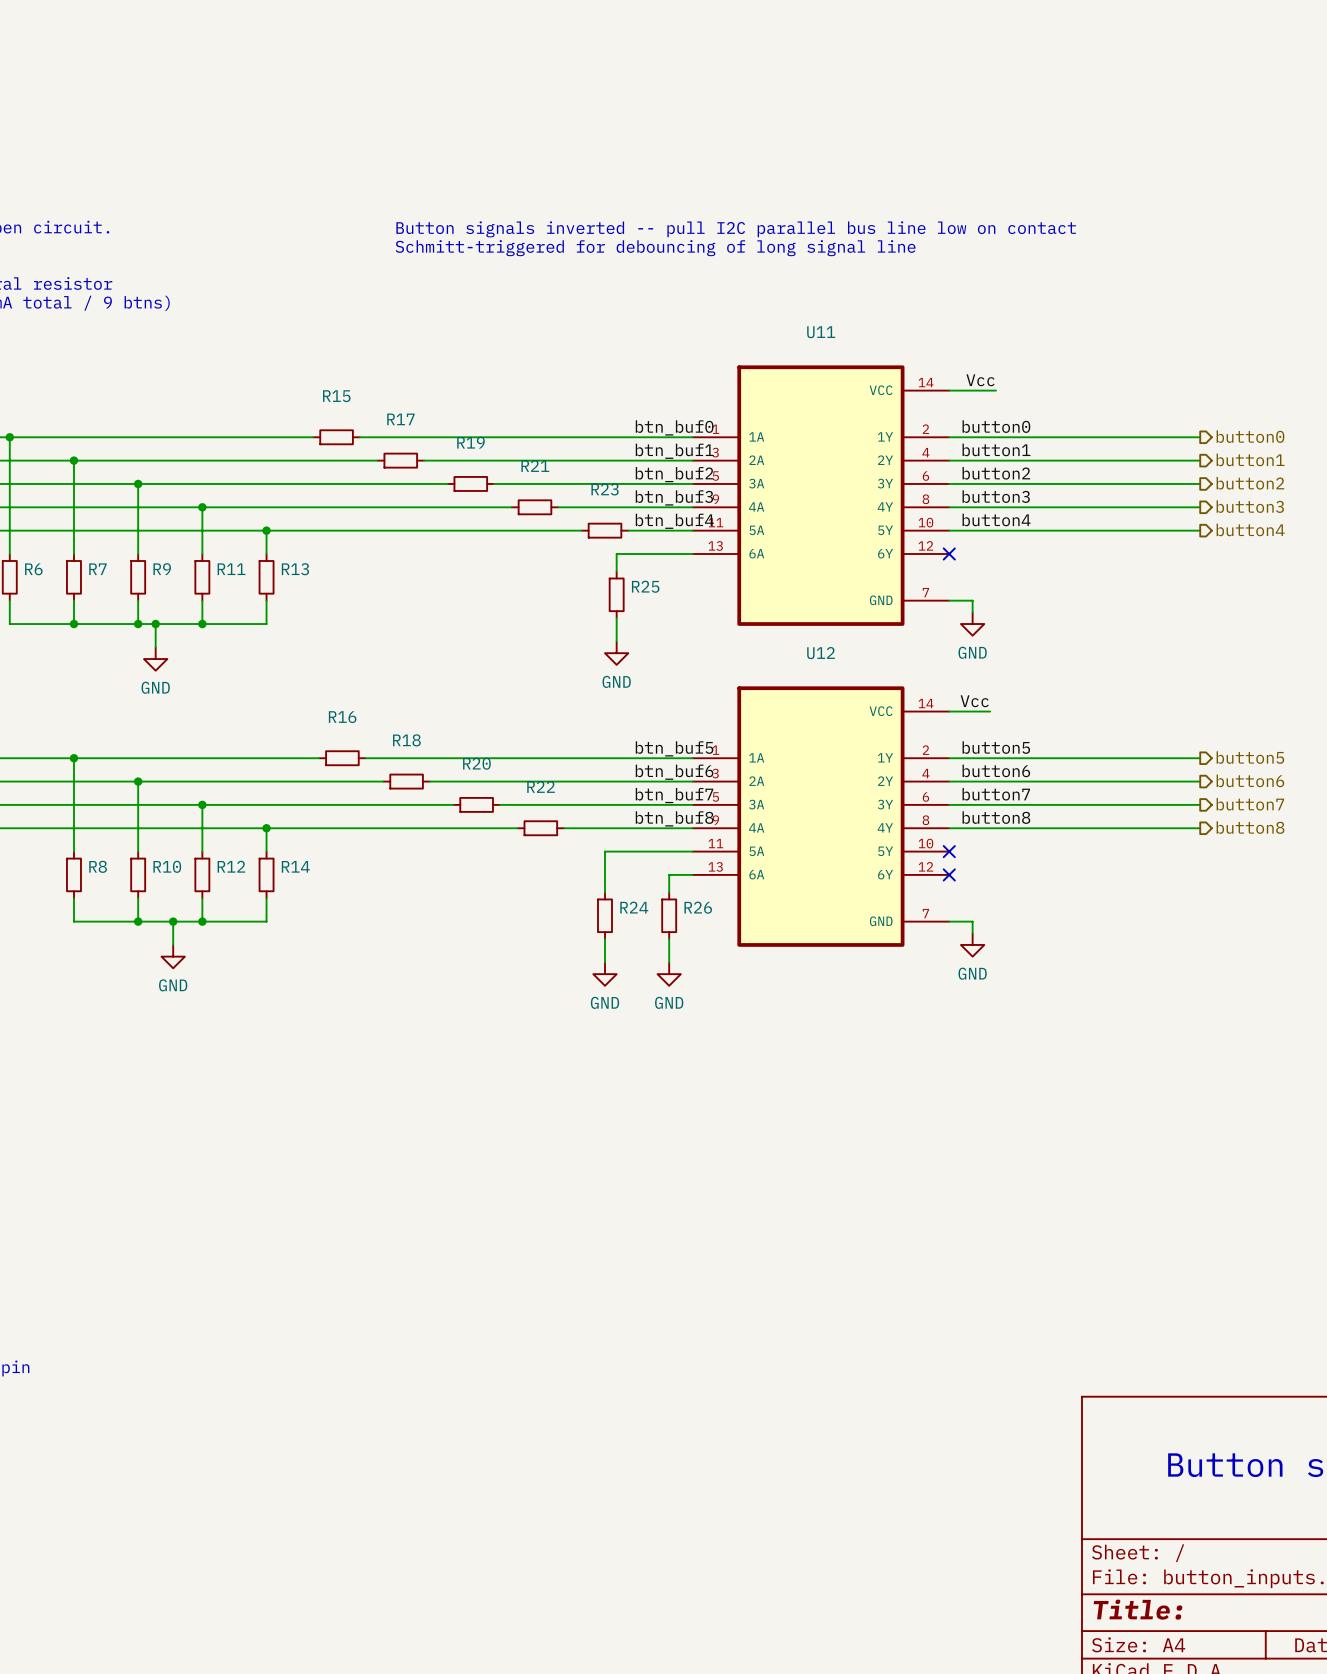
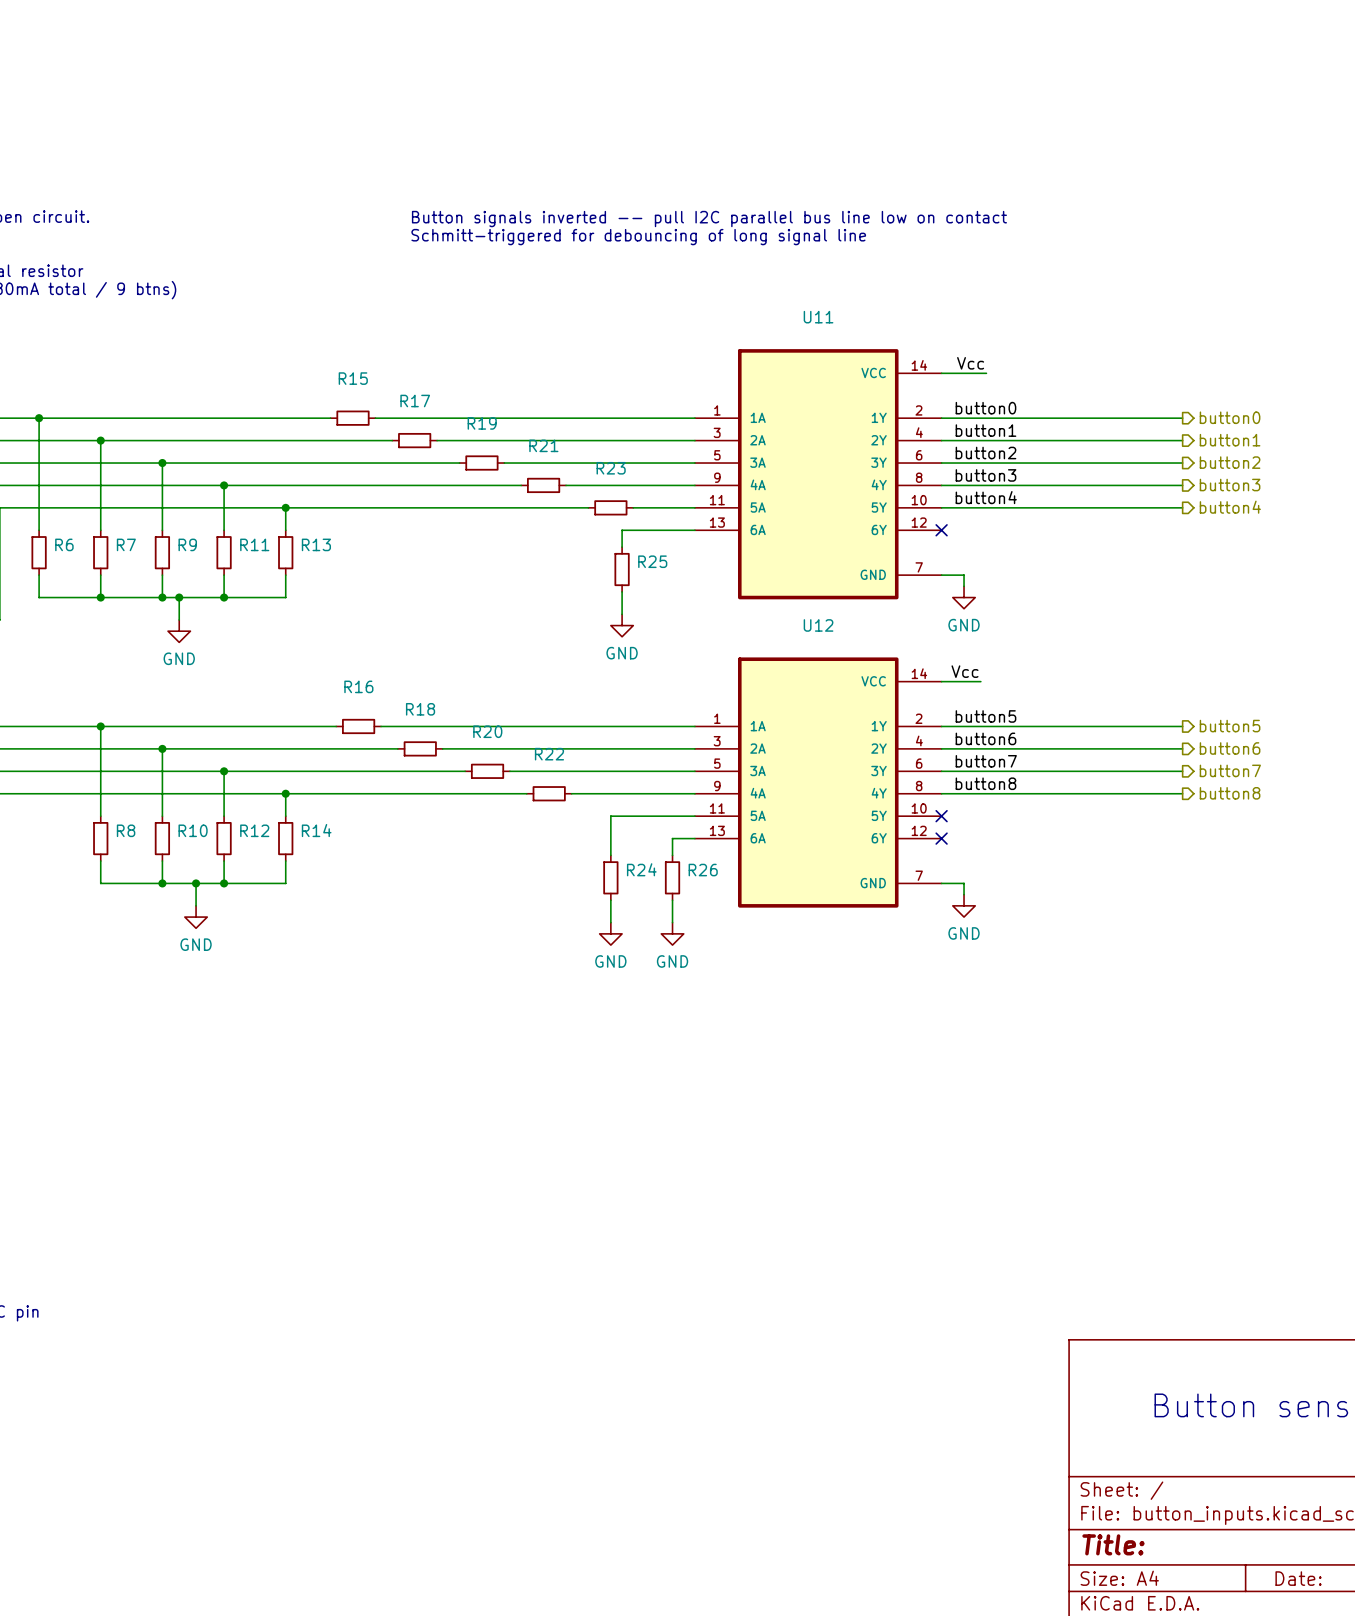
label: btn_buf0 (674, 427) -> none
label: btn_buf1 (674, 451) -> none
label: btn_buf2 (674, 474) -> none
label: btn_buf3 (674, 497) -> none
label: btn_buf4 (674, 521) -> none
label: btn_buf5 (674, 748) -> none
label: btn_buf6 (674, 772) -> none
label: btn_buf7 (674, 795) -> none
label: btn_buf8 (674, 818) -> none

